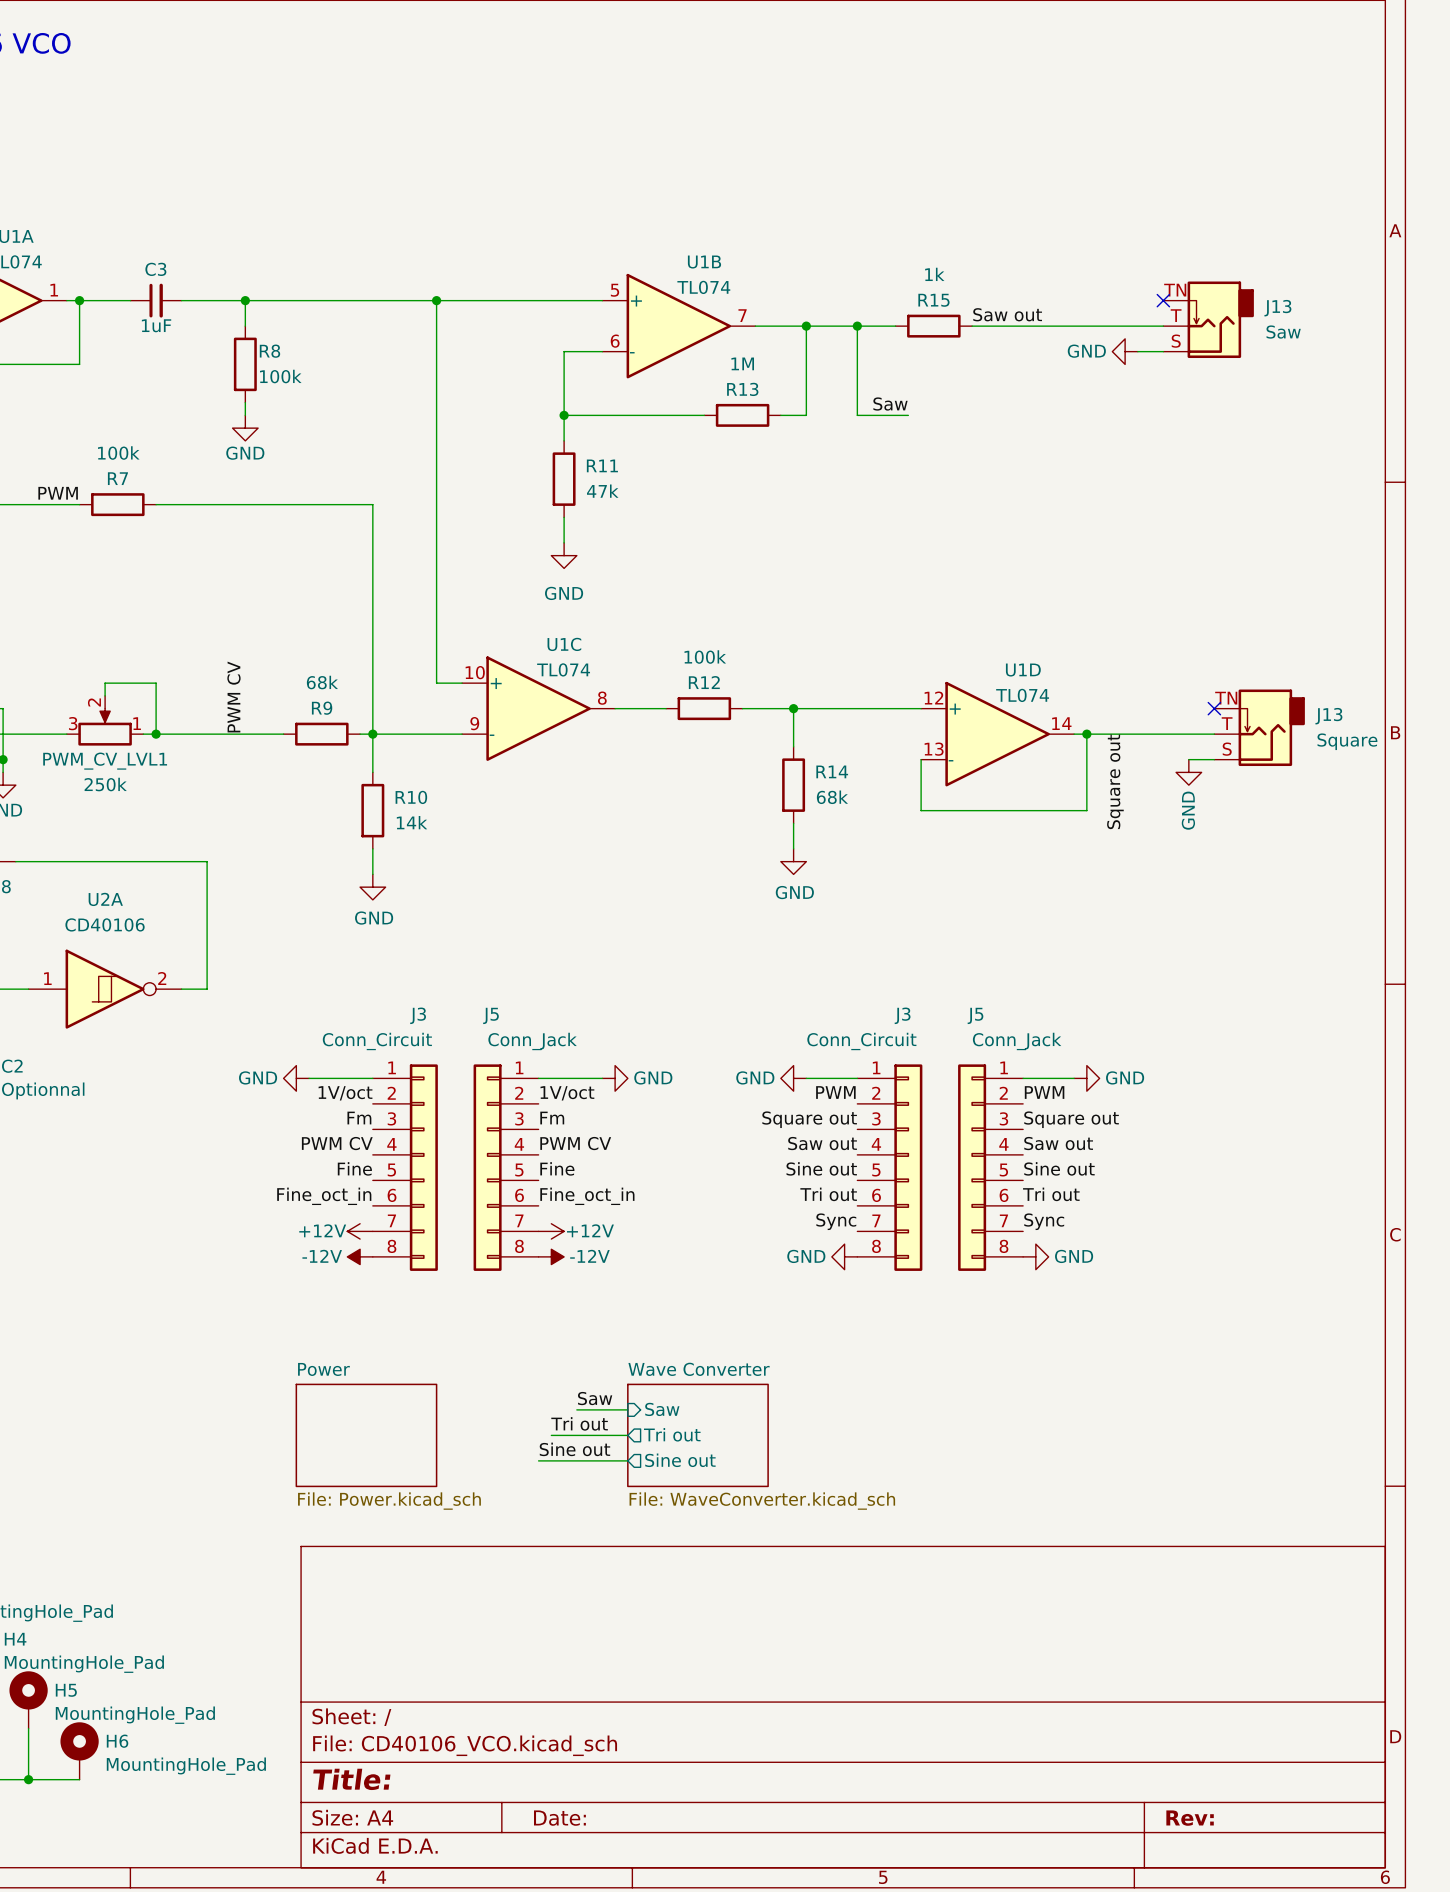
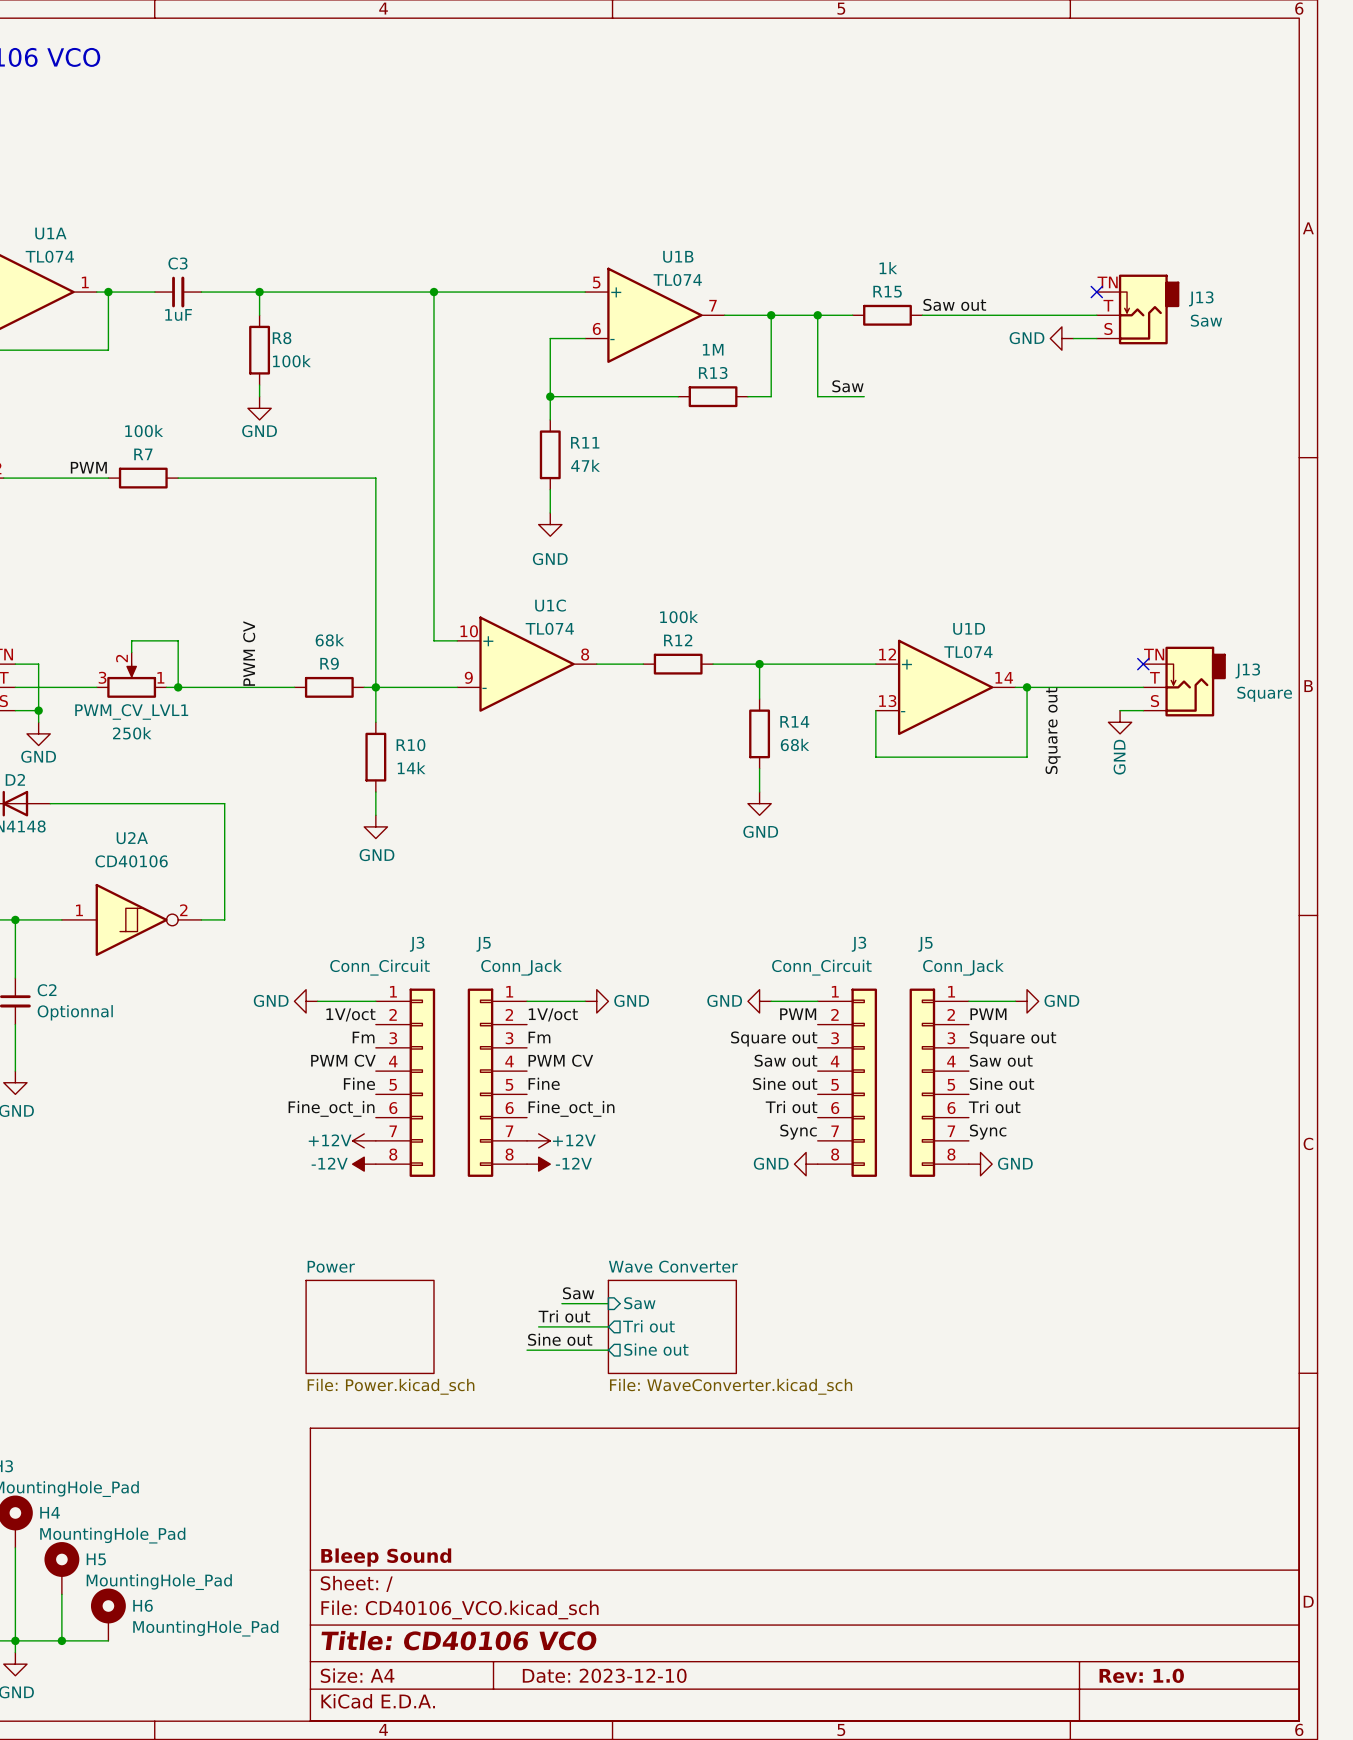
title block: none -> Bleep Sound (386, 1557)
title block: Title: (351, 1779) -> Title: CD40106 VCO (459, 1640)
title block: Date: (559, 1818) -> Date: 2023-12-10 (604, 1675)
title block: Rev: (1190, 1818) -> Rev: 1.0 (1141, 1675)

